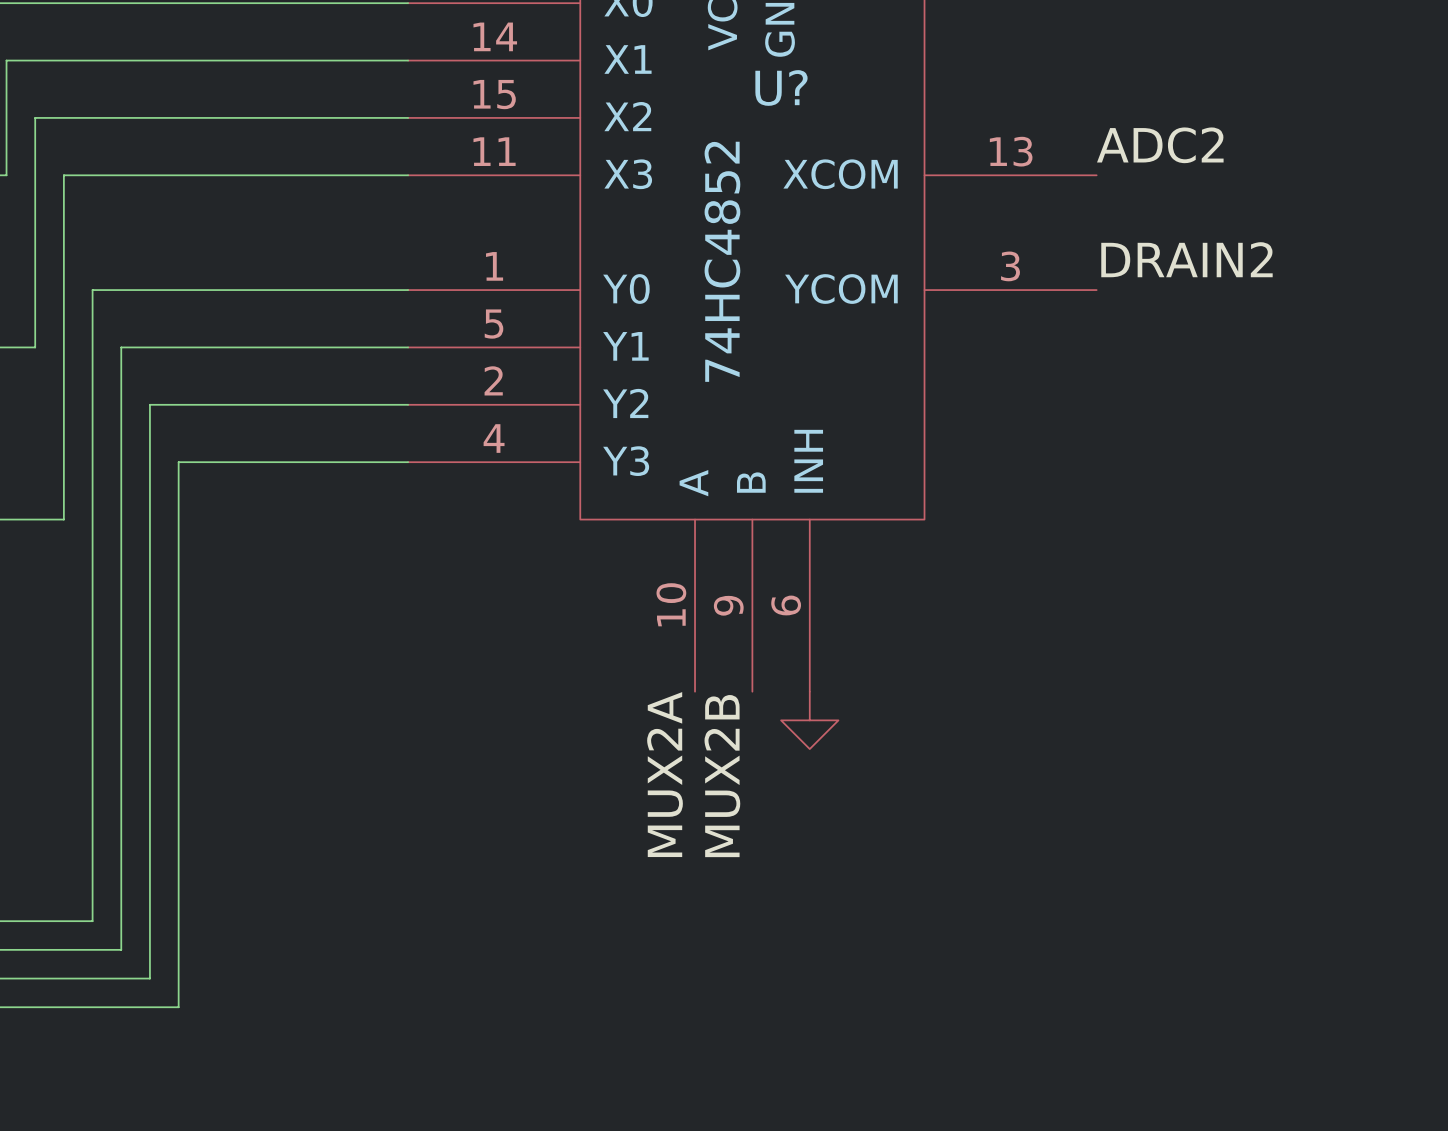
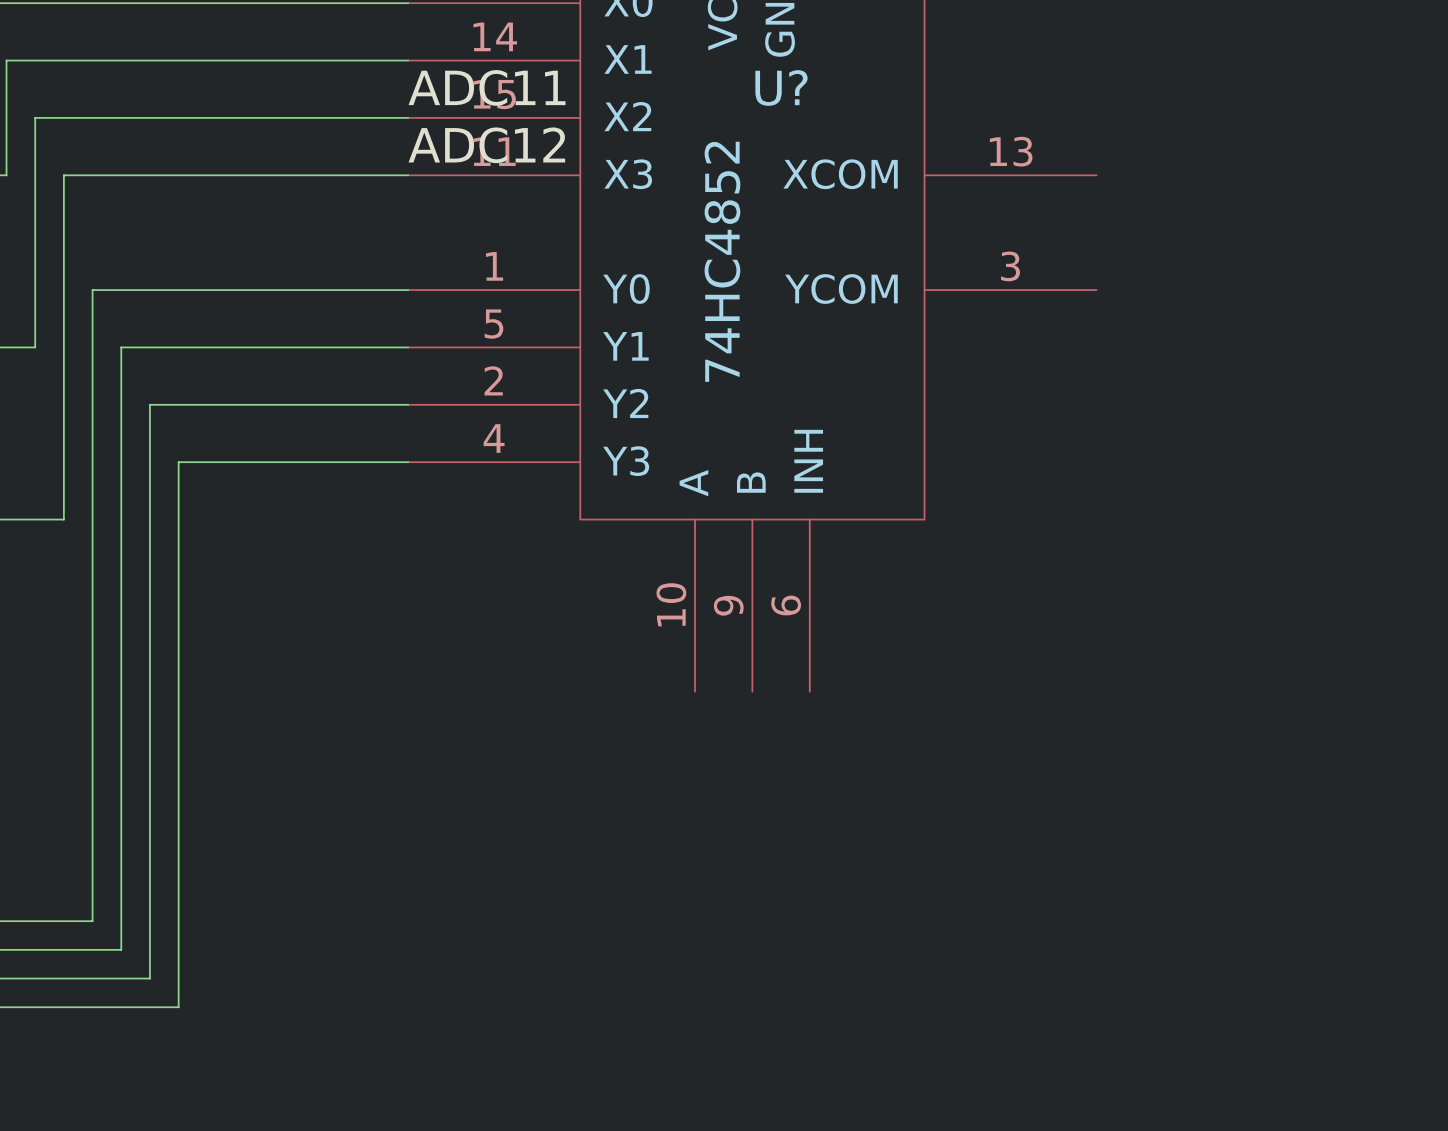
label: none -> ADC11 (487, 87)
label: none -> ADC12 (486, 145)
label: ADC2 (1160, 145) -> none
label: DRAIN2 (1186, 259) -> none
power symbol: (809, 720) -> none
label: MUX2A (665, 774) -> none
label: MUX2B (722, 776) -> none

